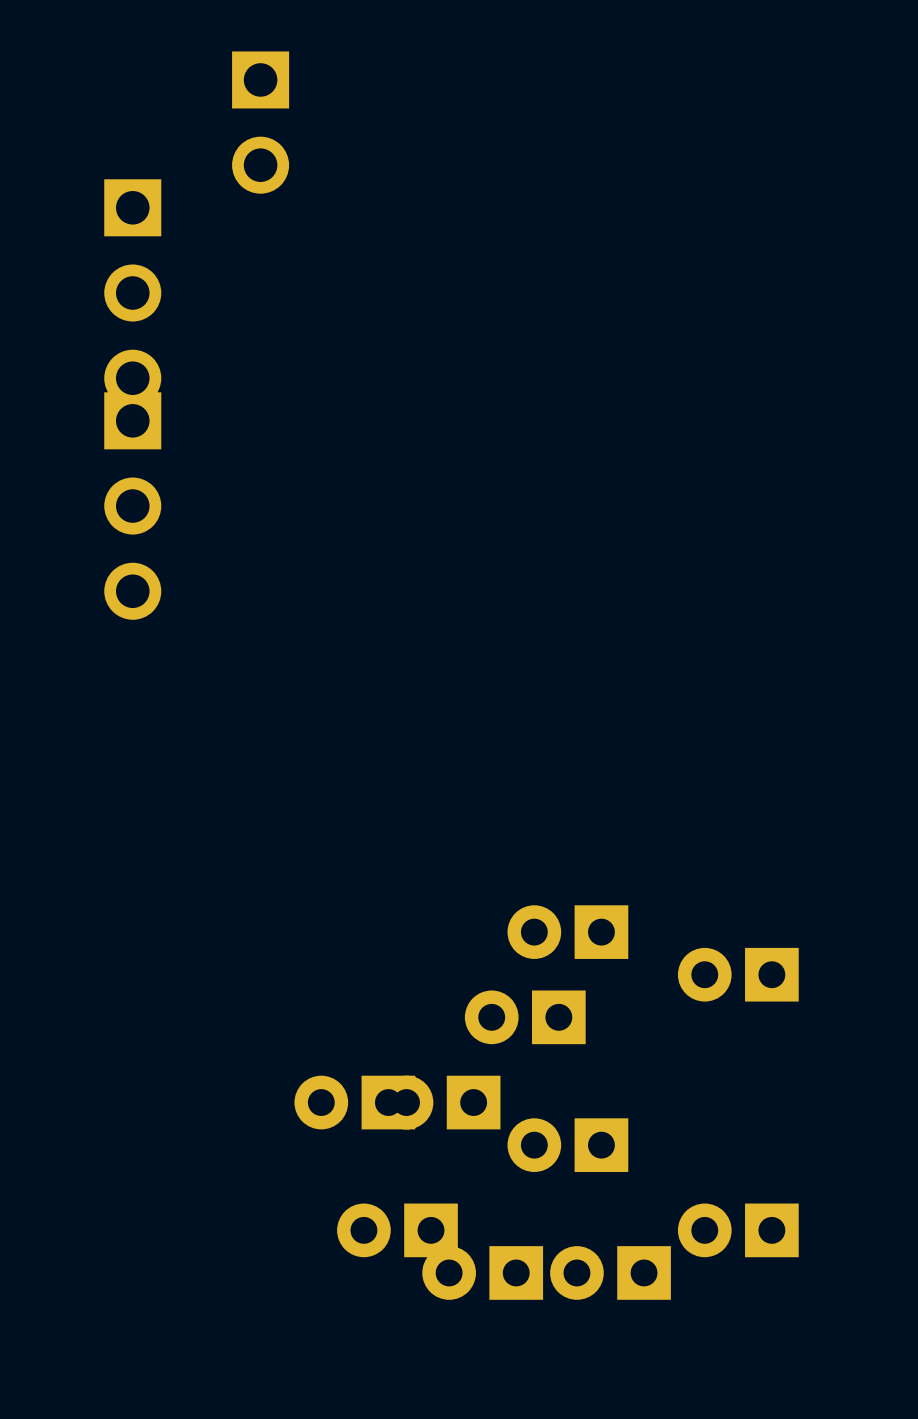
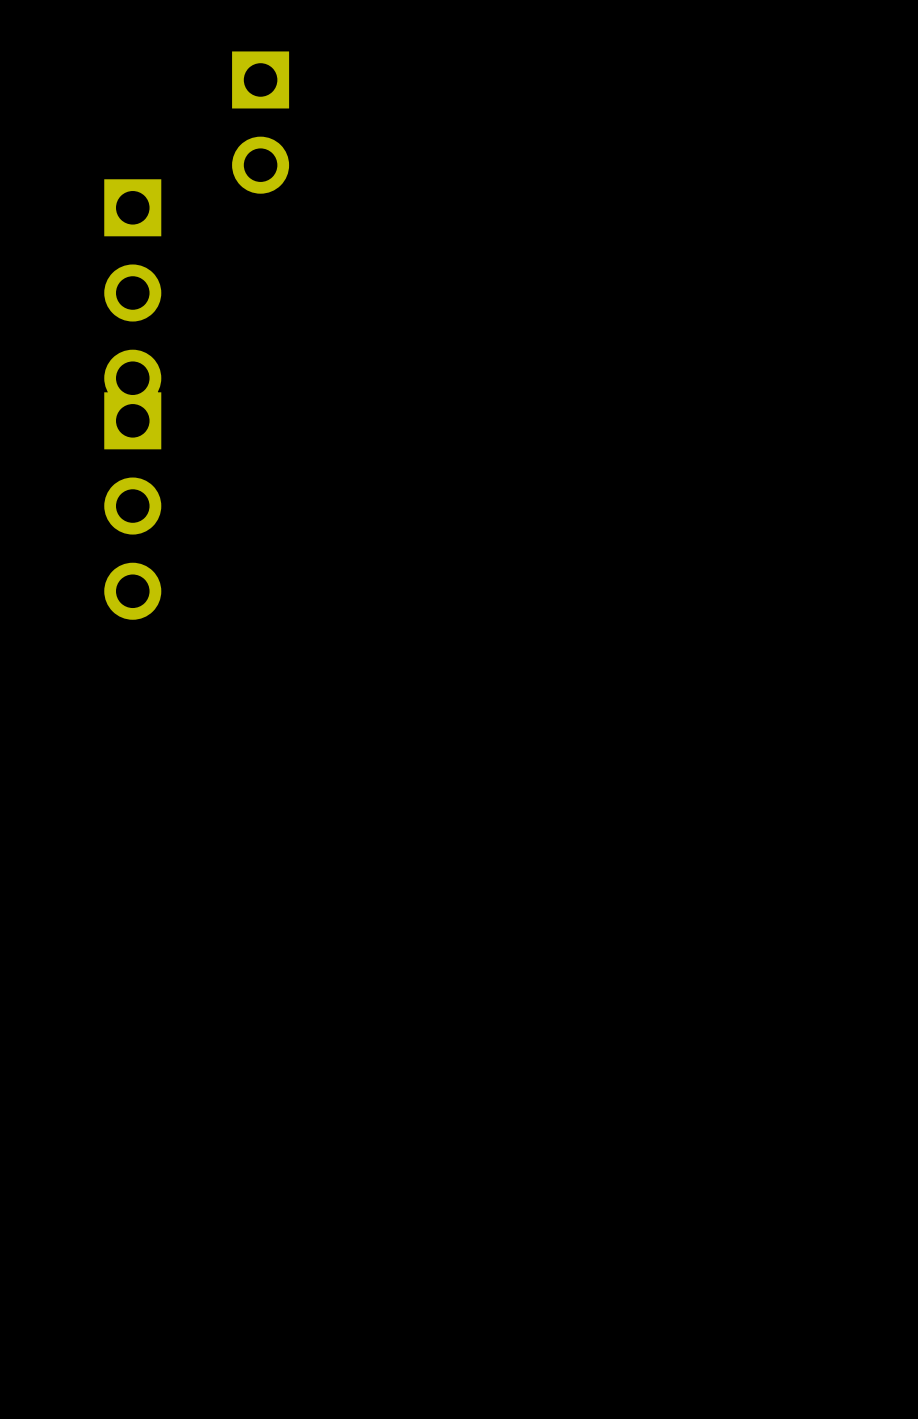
part: (567, 932) -> none
part: (738, 974) -> none
part: (525, 1017) -> none
part: (354, 1102) -> none
part: (440, 1102) -> none
part: (567, 1145) -> none
part: (397, 1230) -> none
part: (738, 1230) -> none
part: (482, 1272) -> none
part: (610, 1272) -> none

